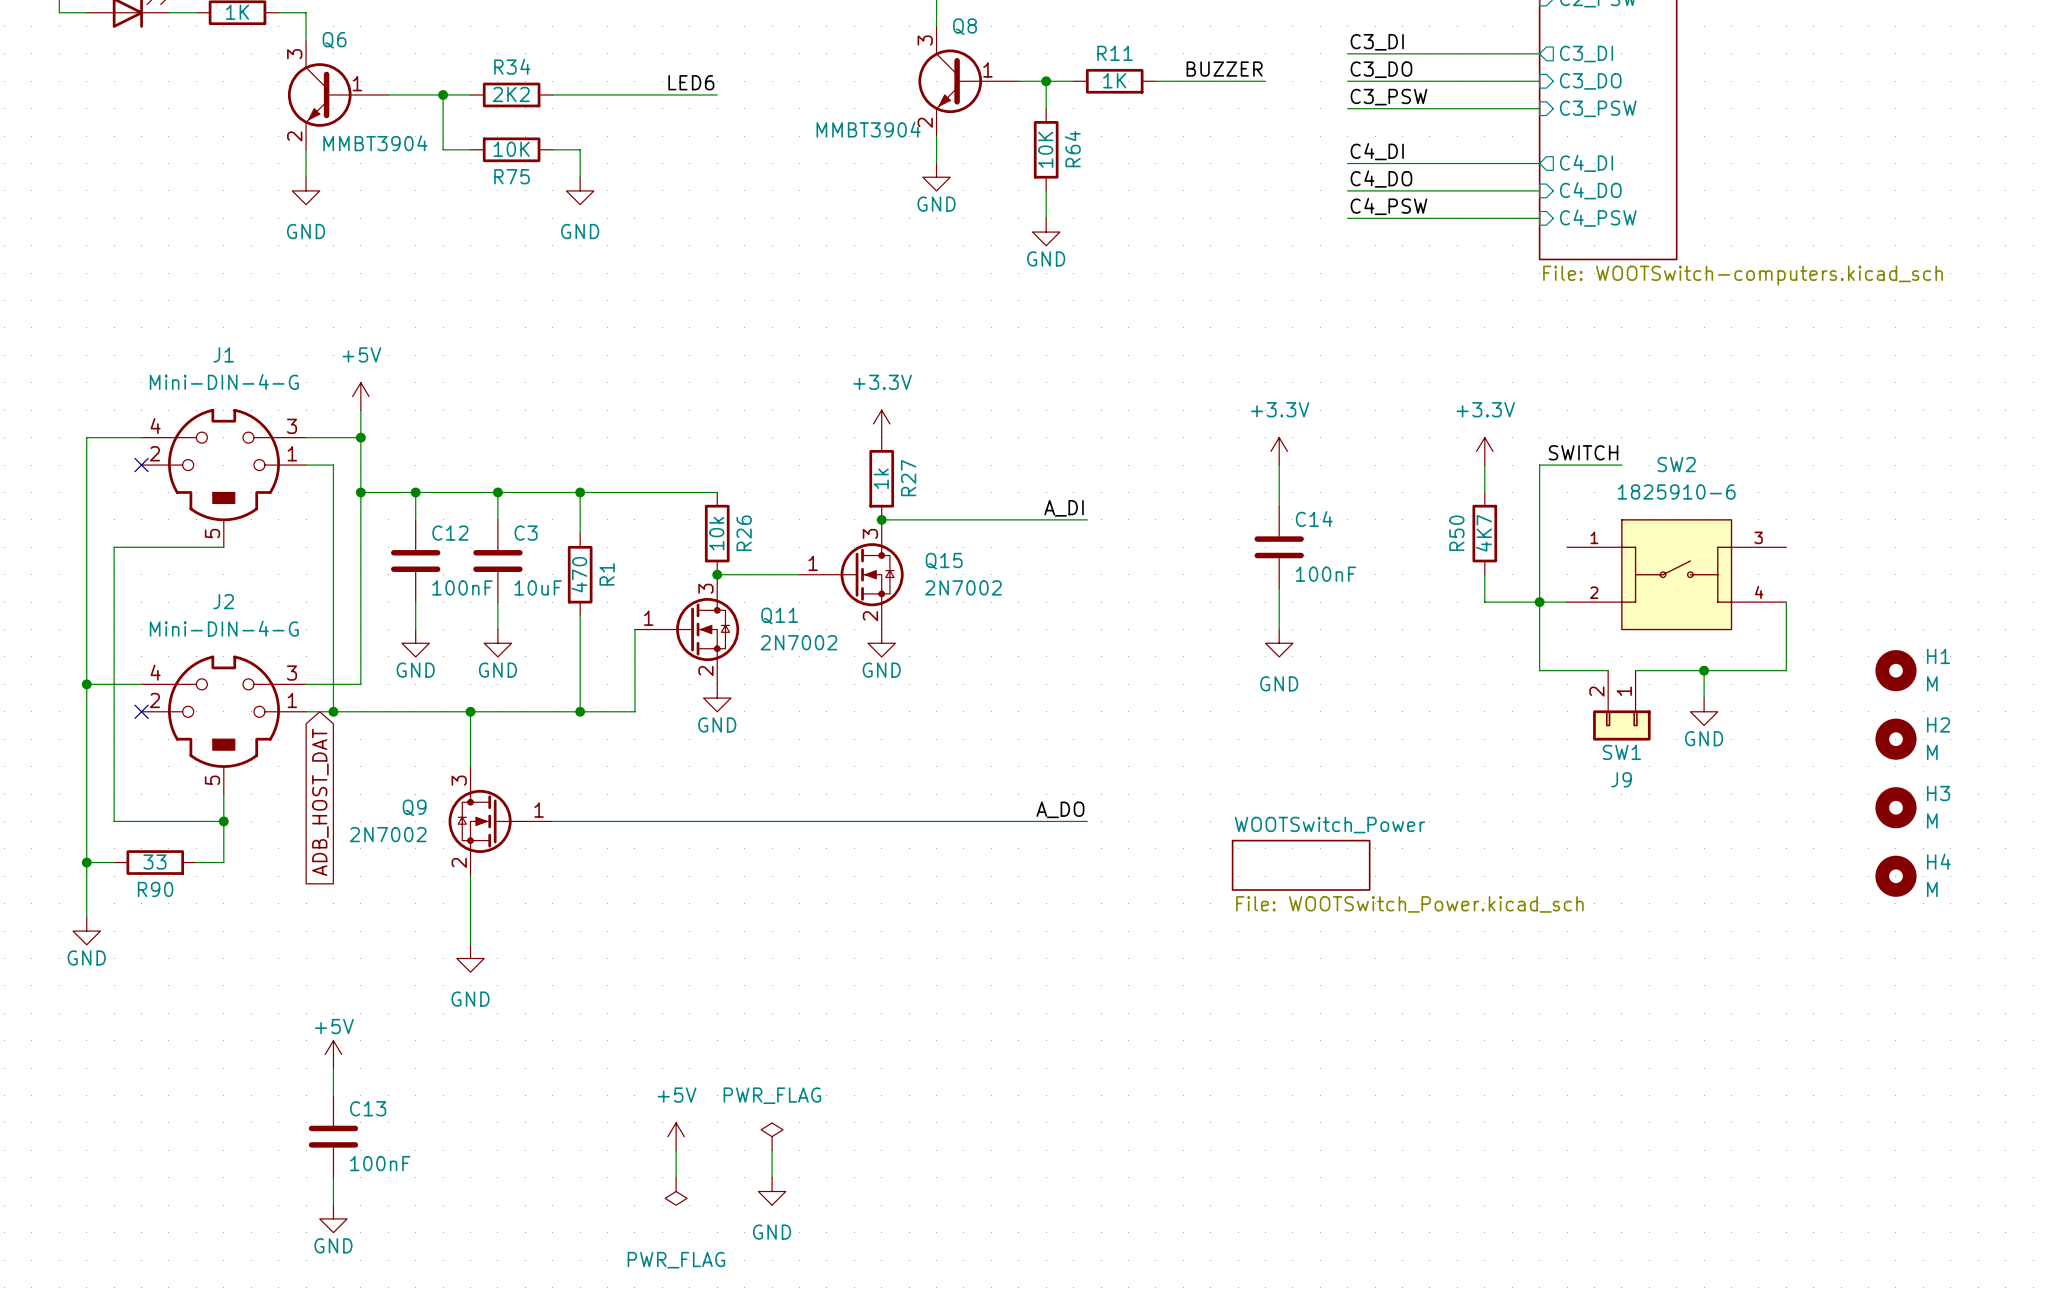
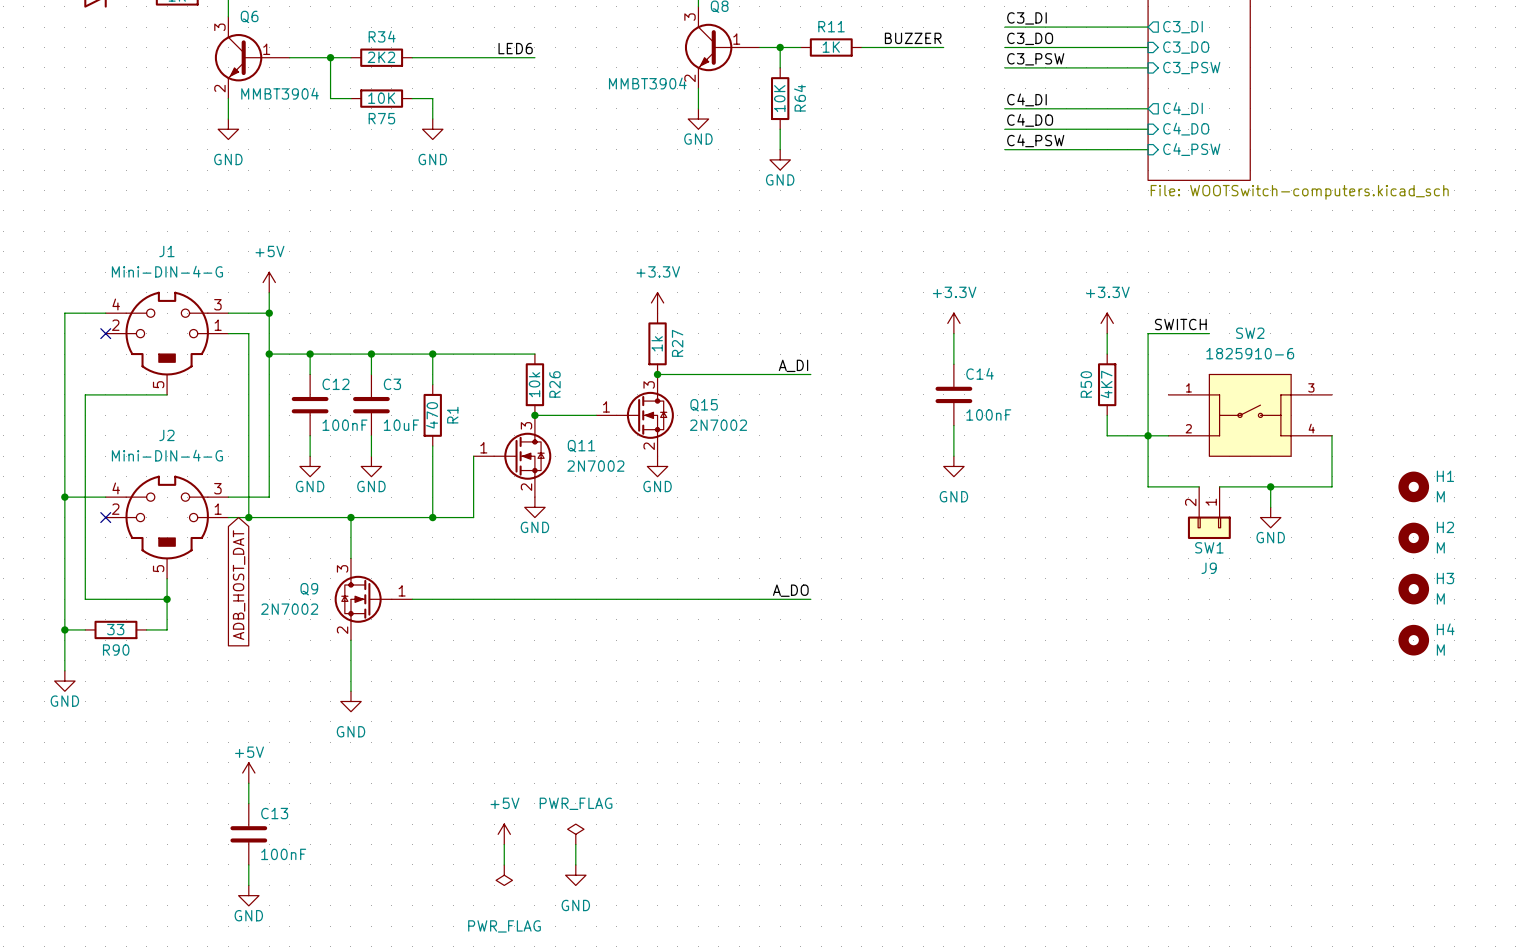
sheet WOOTSwitch_Power: File: WOOTSwitch_Power.kicad_sch (1301, 865) -> none

